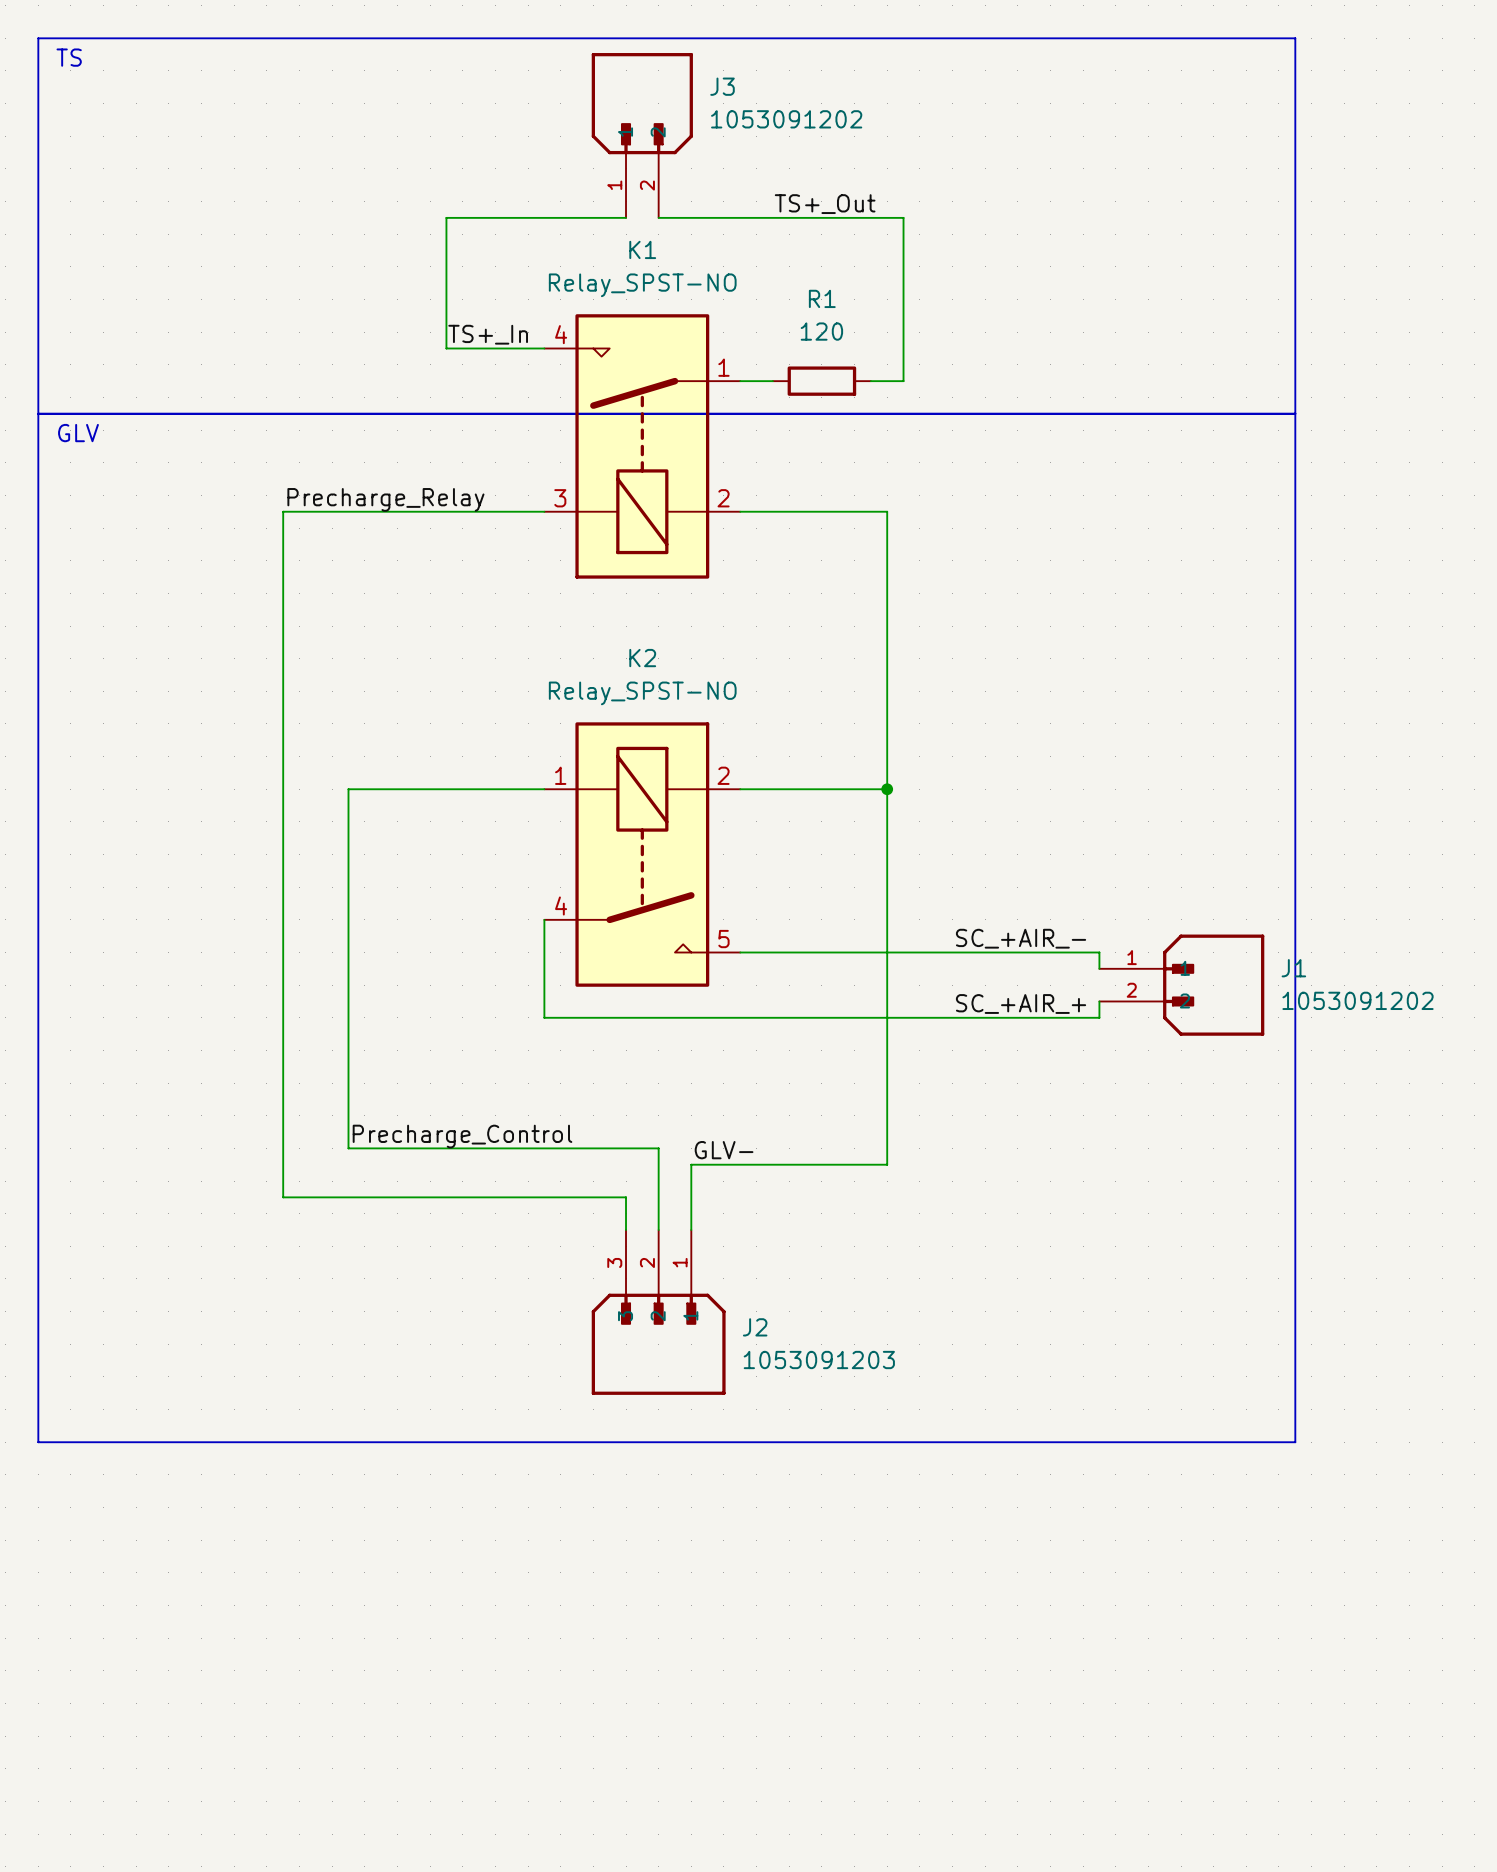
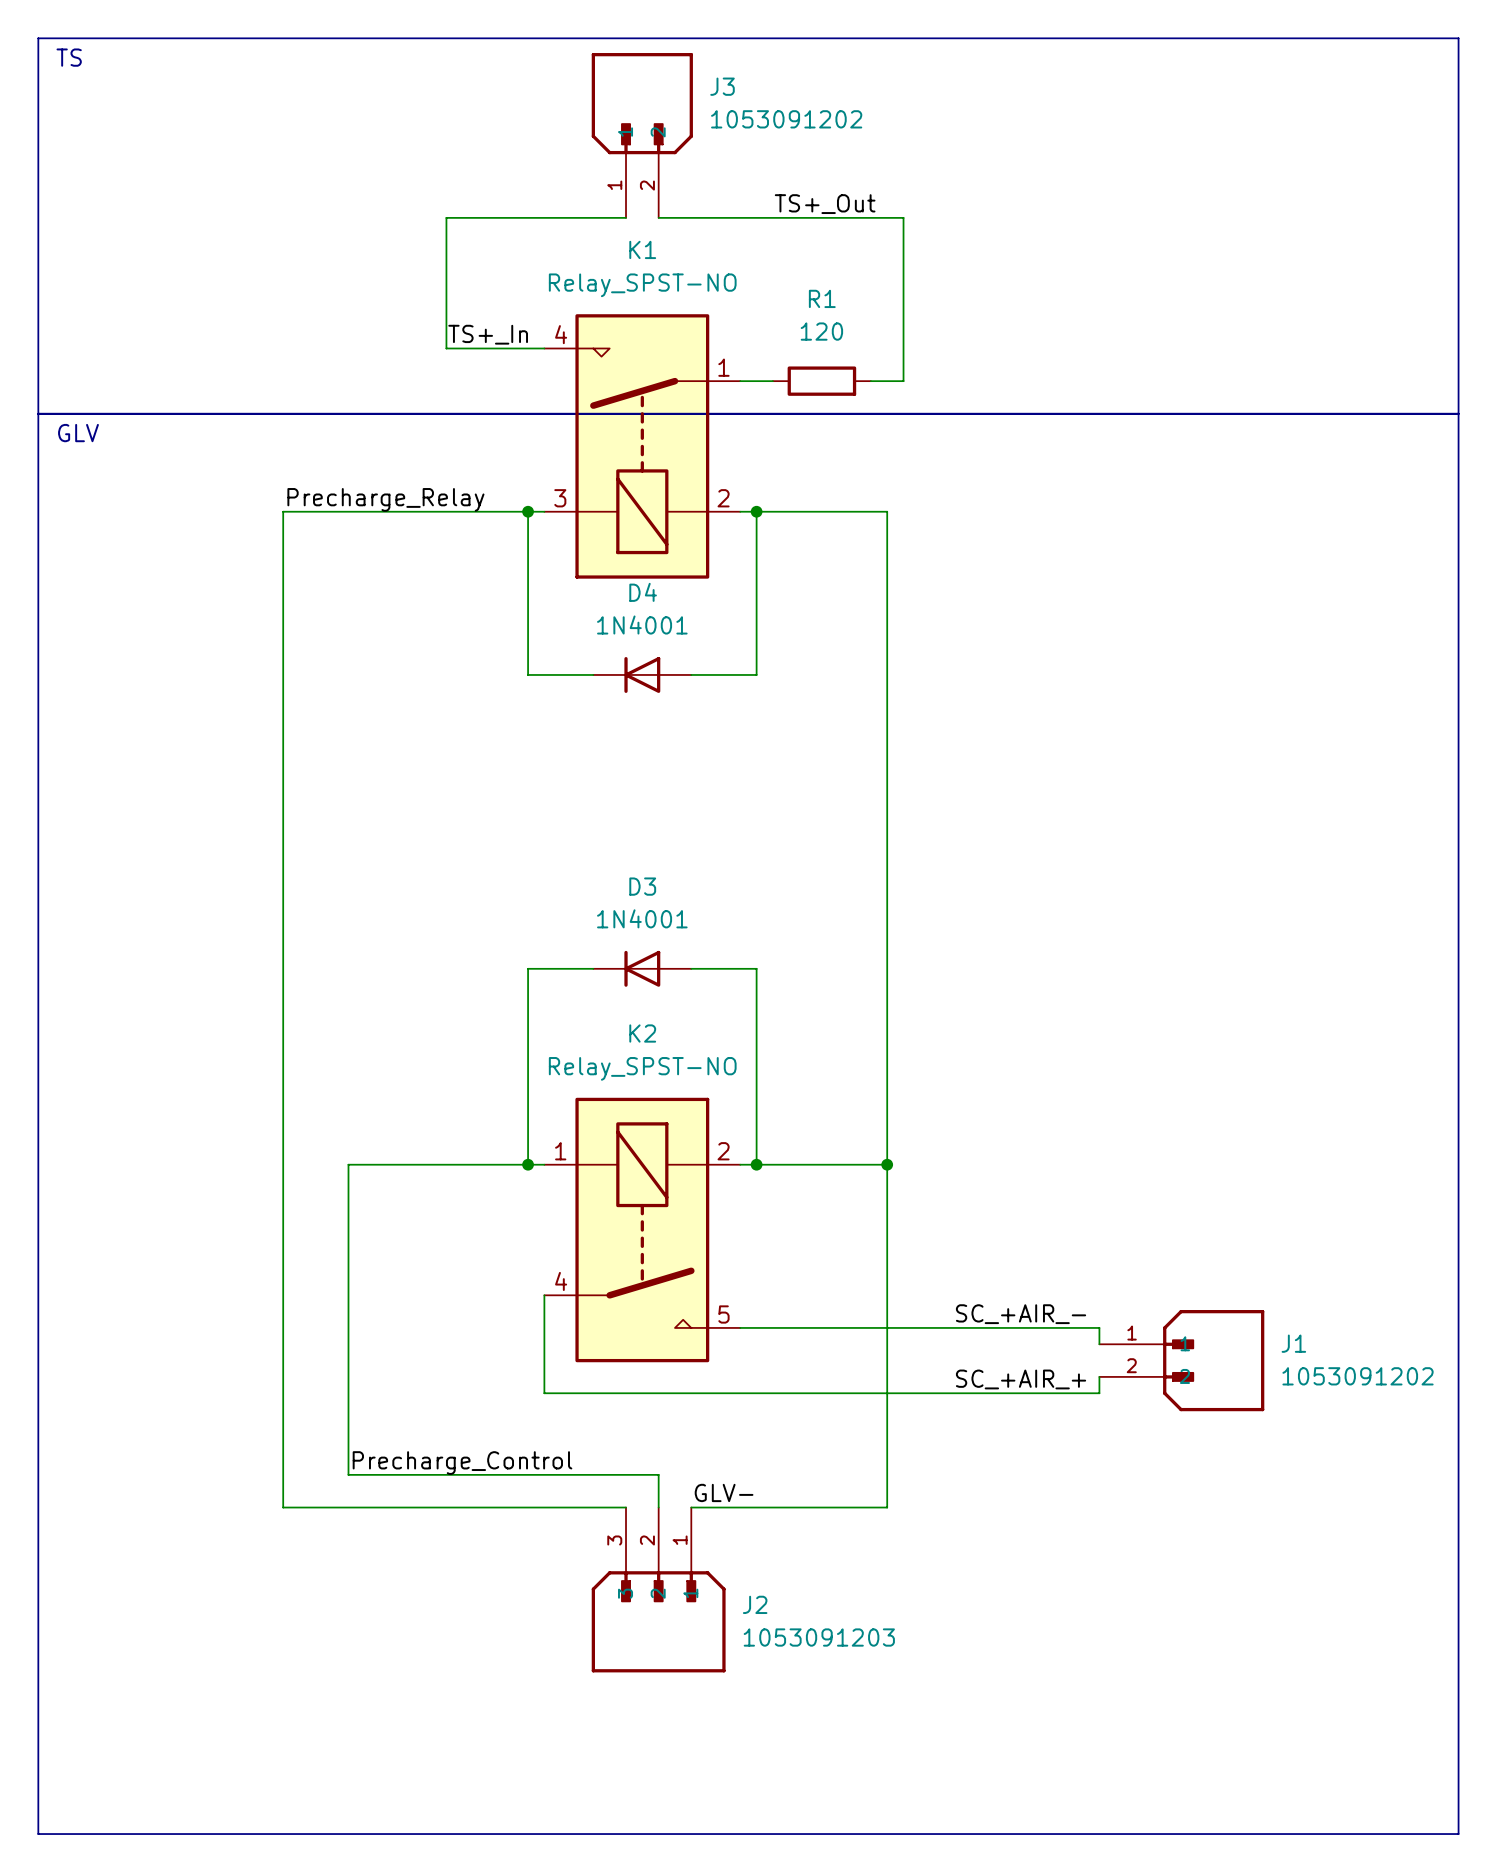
line: (1295, 38) (1295, 1442) (38, 1442) -> (1295, 38) (1458, 38) (1458, 1834) (38, 1834) (38, 1442)
line: none -> (1295, 413) (1458, 413)
wire: none -> (528, 511) (528, 674) (593, 674)
junction: none -> (528, 511)
wire: none -> (756, 511) (756, 674) (691, 674)
junction: none -> (756, 511)
D4: none -> 1N4001 (642, 674)
wire: (544, 789) (348, 789) (348, 1148) (658, 1148) (658, 1230) -> none
wire: (740, 789) (887, 789) -> none
junction: (887, 789) -> none
K2 position: (642, 854) -> (642, 1230)
wire: (544, 919) (544, 1017) (1099, 1017) (1099, 1001) -> none
label: SC_+AIR_- (1021, 938) -> none
wire: (740, 952) (1099, 952) (1099, 968) -> none
wire: none -> (593, 968) (528, 968) (528, 1164)
D3: none -> 1N4001 (642, 968)
wire: none -> (691, 968) (756, 968) (756, 1164)
J1 position: (1181, 985) -> (1181, 1360)
label: SC_+AIR_+ (1021, 1004) -> none
label: Precharge_Control (462, 1136) -> none
label: GLV- (724, 1150) -> none
junction: none -> (528, 1164)
wire: none -> (544, 1164) (348, 1164) (348, 1474) (658, 1474) (658, 1507)
junction: none -> (756, 1164)
wire: none -> (887, 1164) (887, 1507) (691, 1507)
junction: none -> (887, 1164)
wire: (283, 1197) (626, 1197) (626, 1230) -> (283, 1197) (283, 1507) (626, 1507)
wire: none -> (544, 1295) (544, 1393) (1099, 1393) (1099, 1376)
J2 position: (658, 1312) -> (658, 1589)
label: none -> SC_+AIR_- (1021, 1314)
wire: none -> (740, 1327) (1099, 1327) (1099, 1344)
label: none -> SC_+AIR_+ (1021, 1379)
label: none -> Precharge_Control (462, 1463)
label: none -> GLV- (724, 1492)

